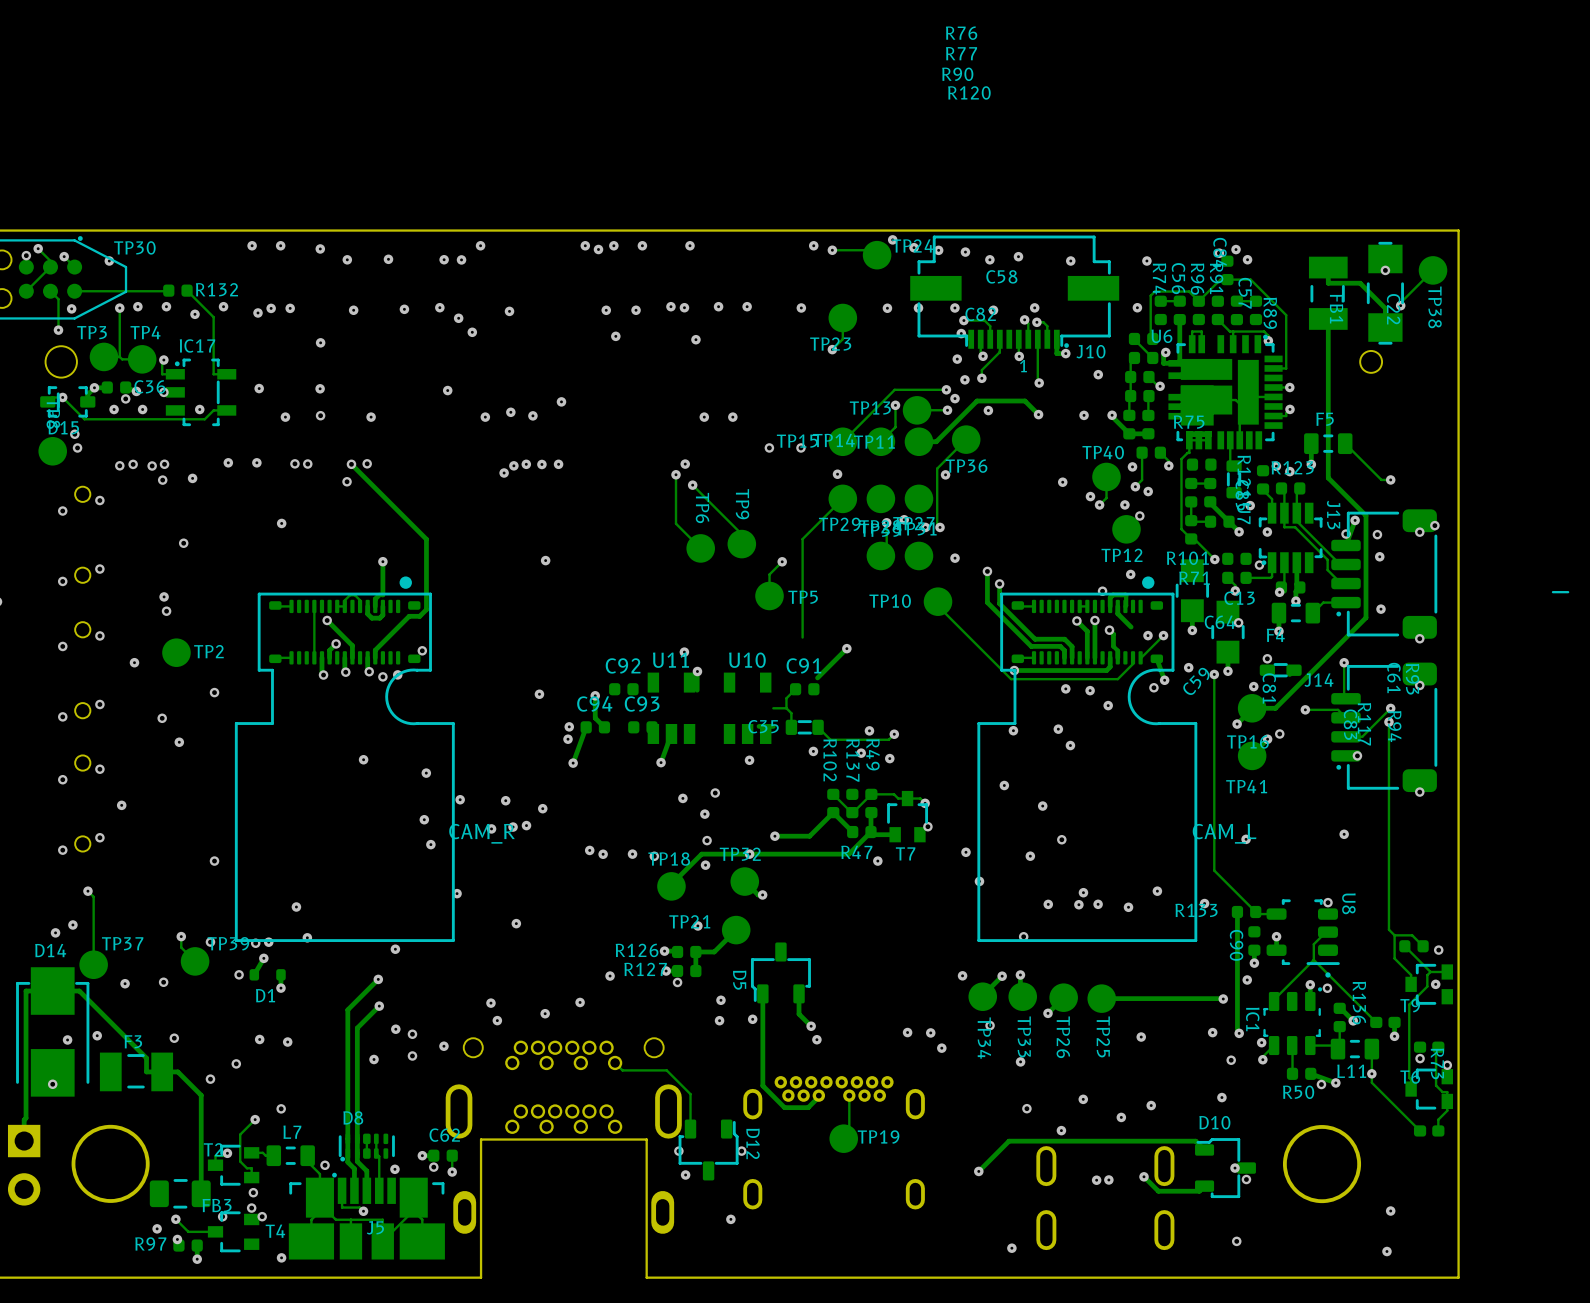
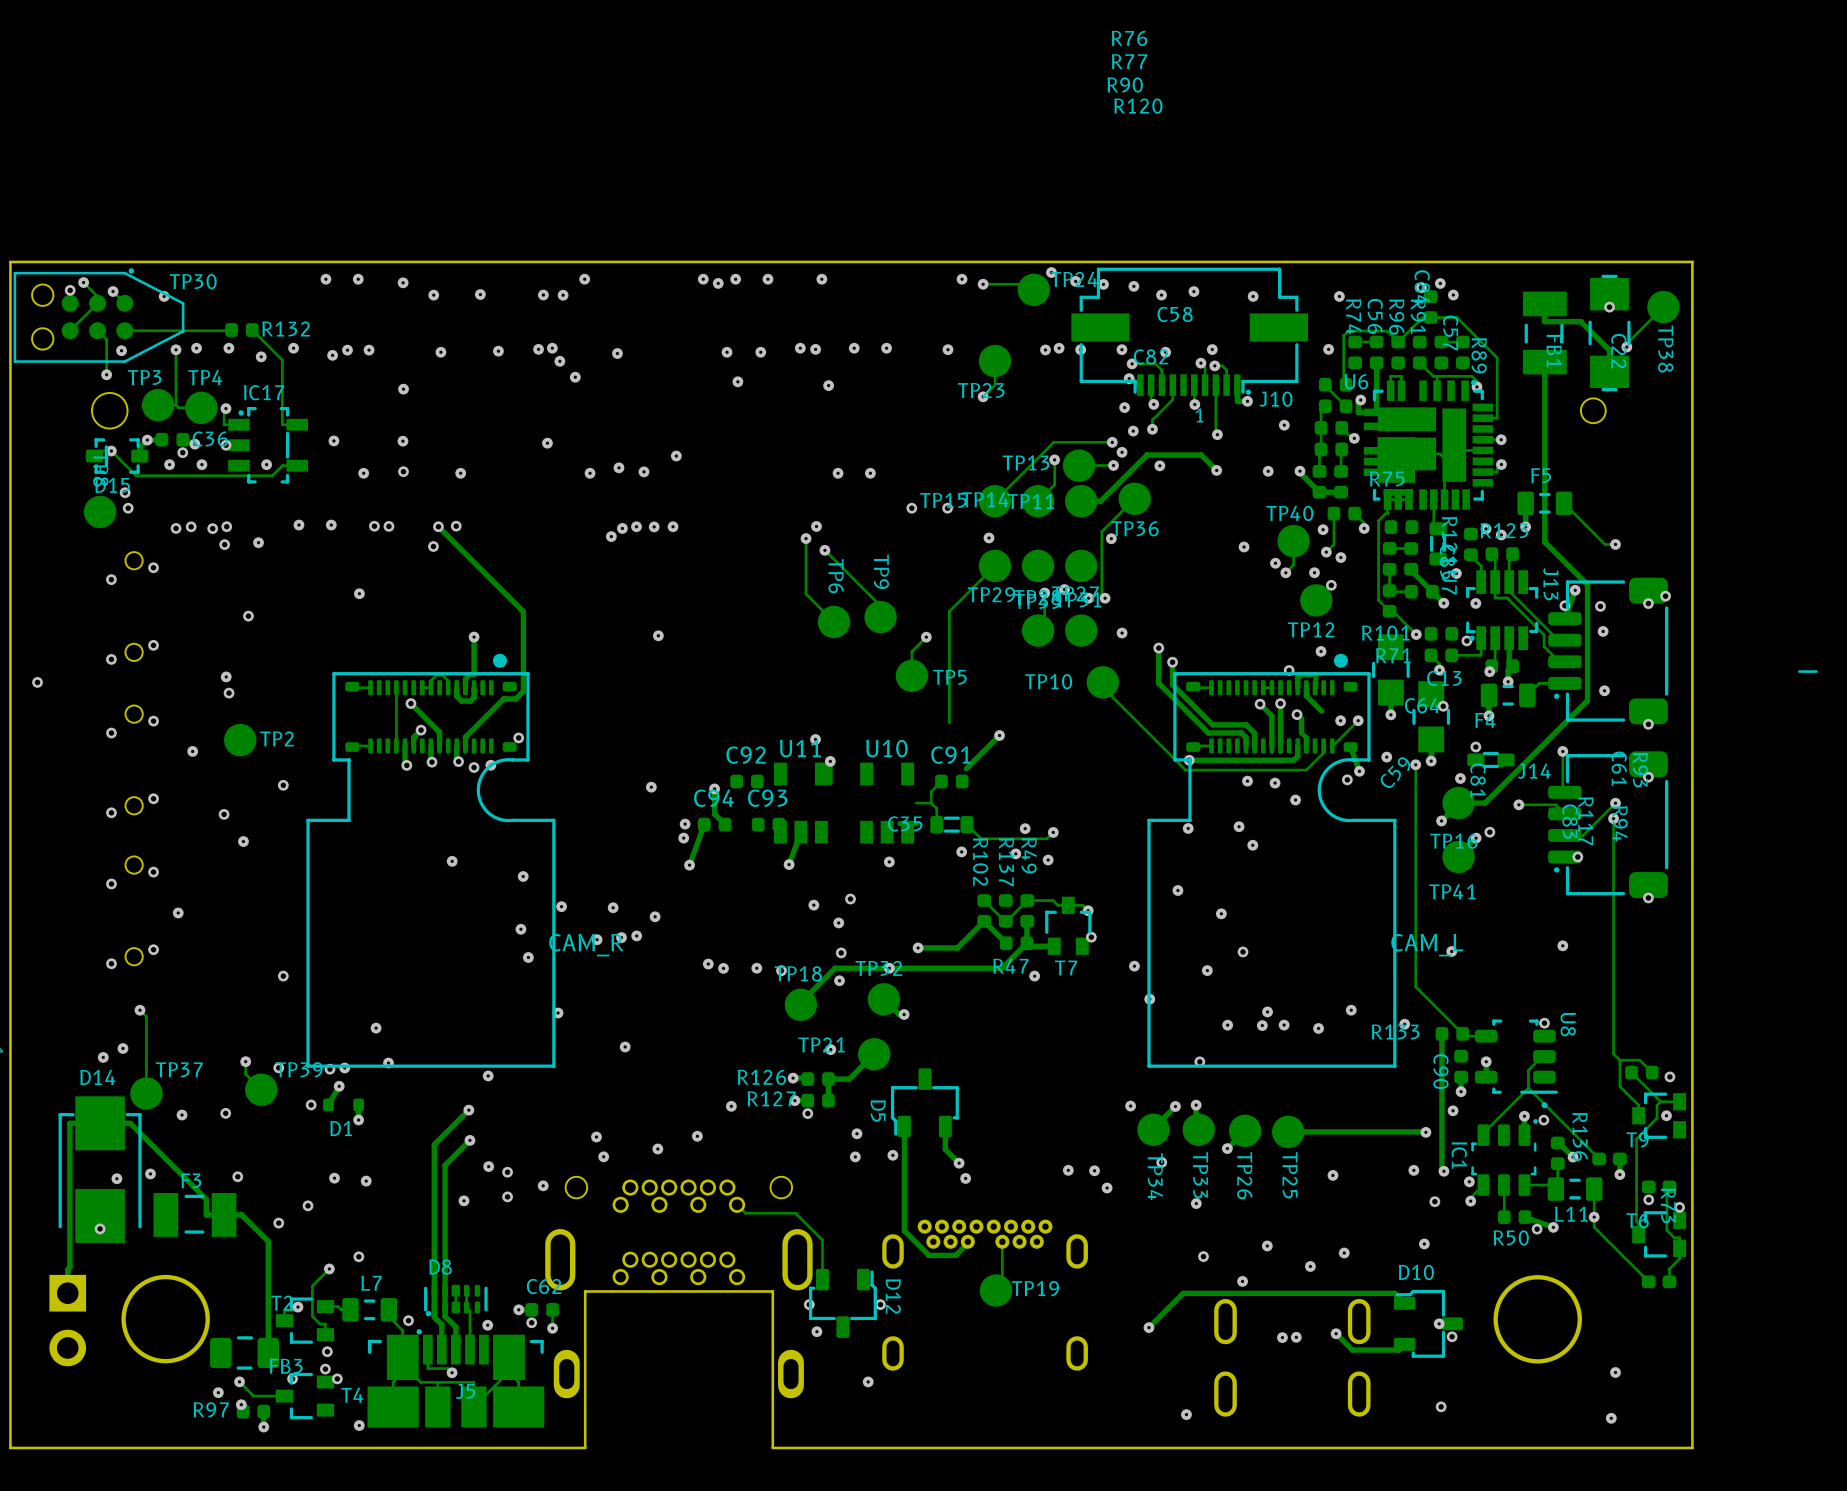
via: none -> (552, 348)
via: none -> (1059, 348)

